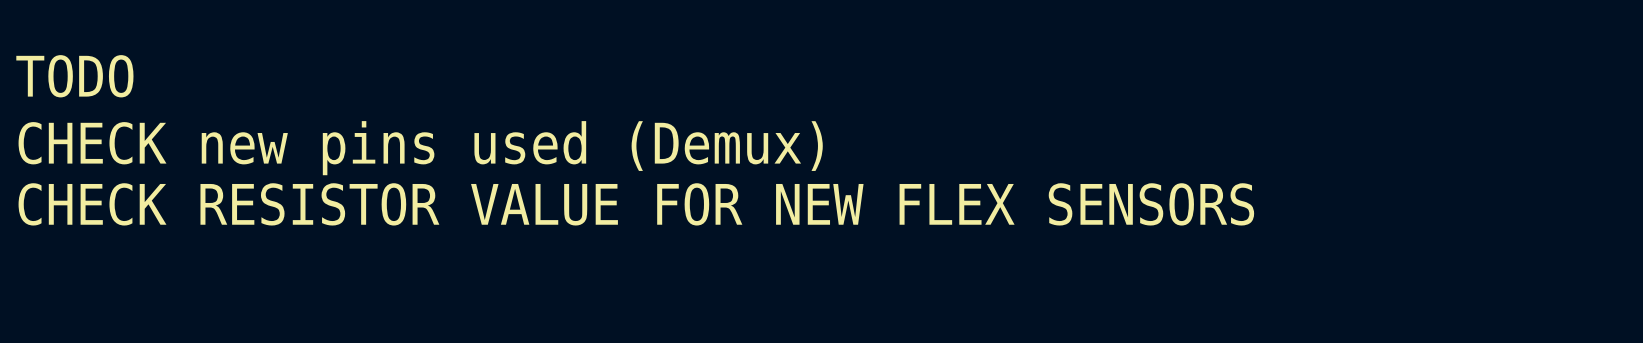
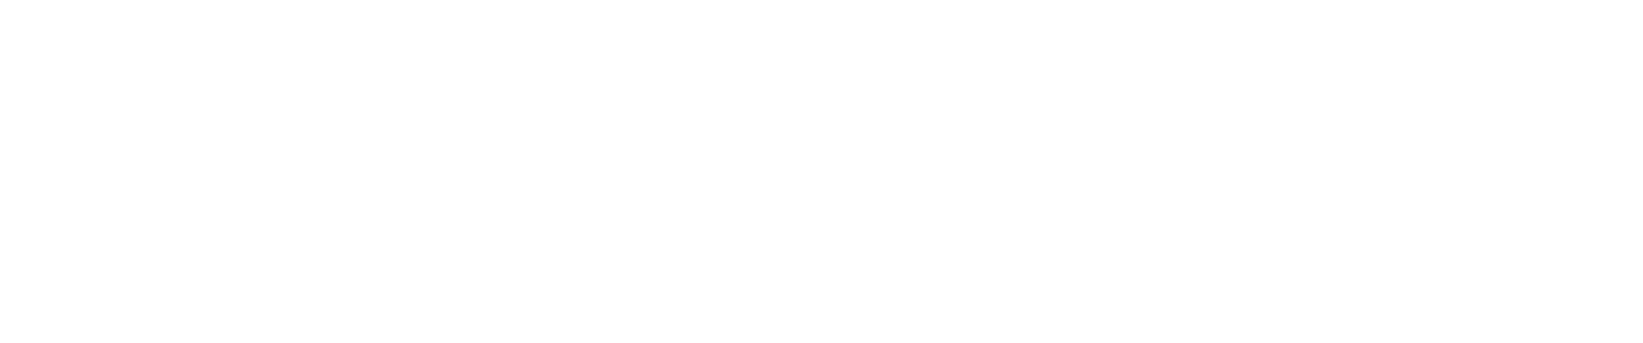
text: TODO (74, 76) -> none
text: CHECK new pins used (Demux) (420, 148) -> none
text: CHECK RESISTOR VALUE FOR NEW FLEX SENSORS (636, 204) -> none

